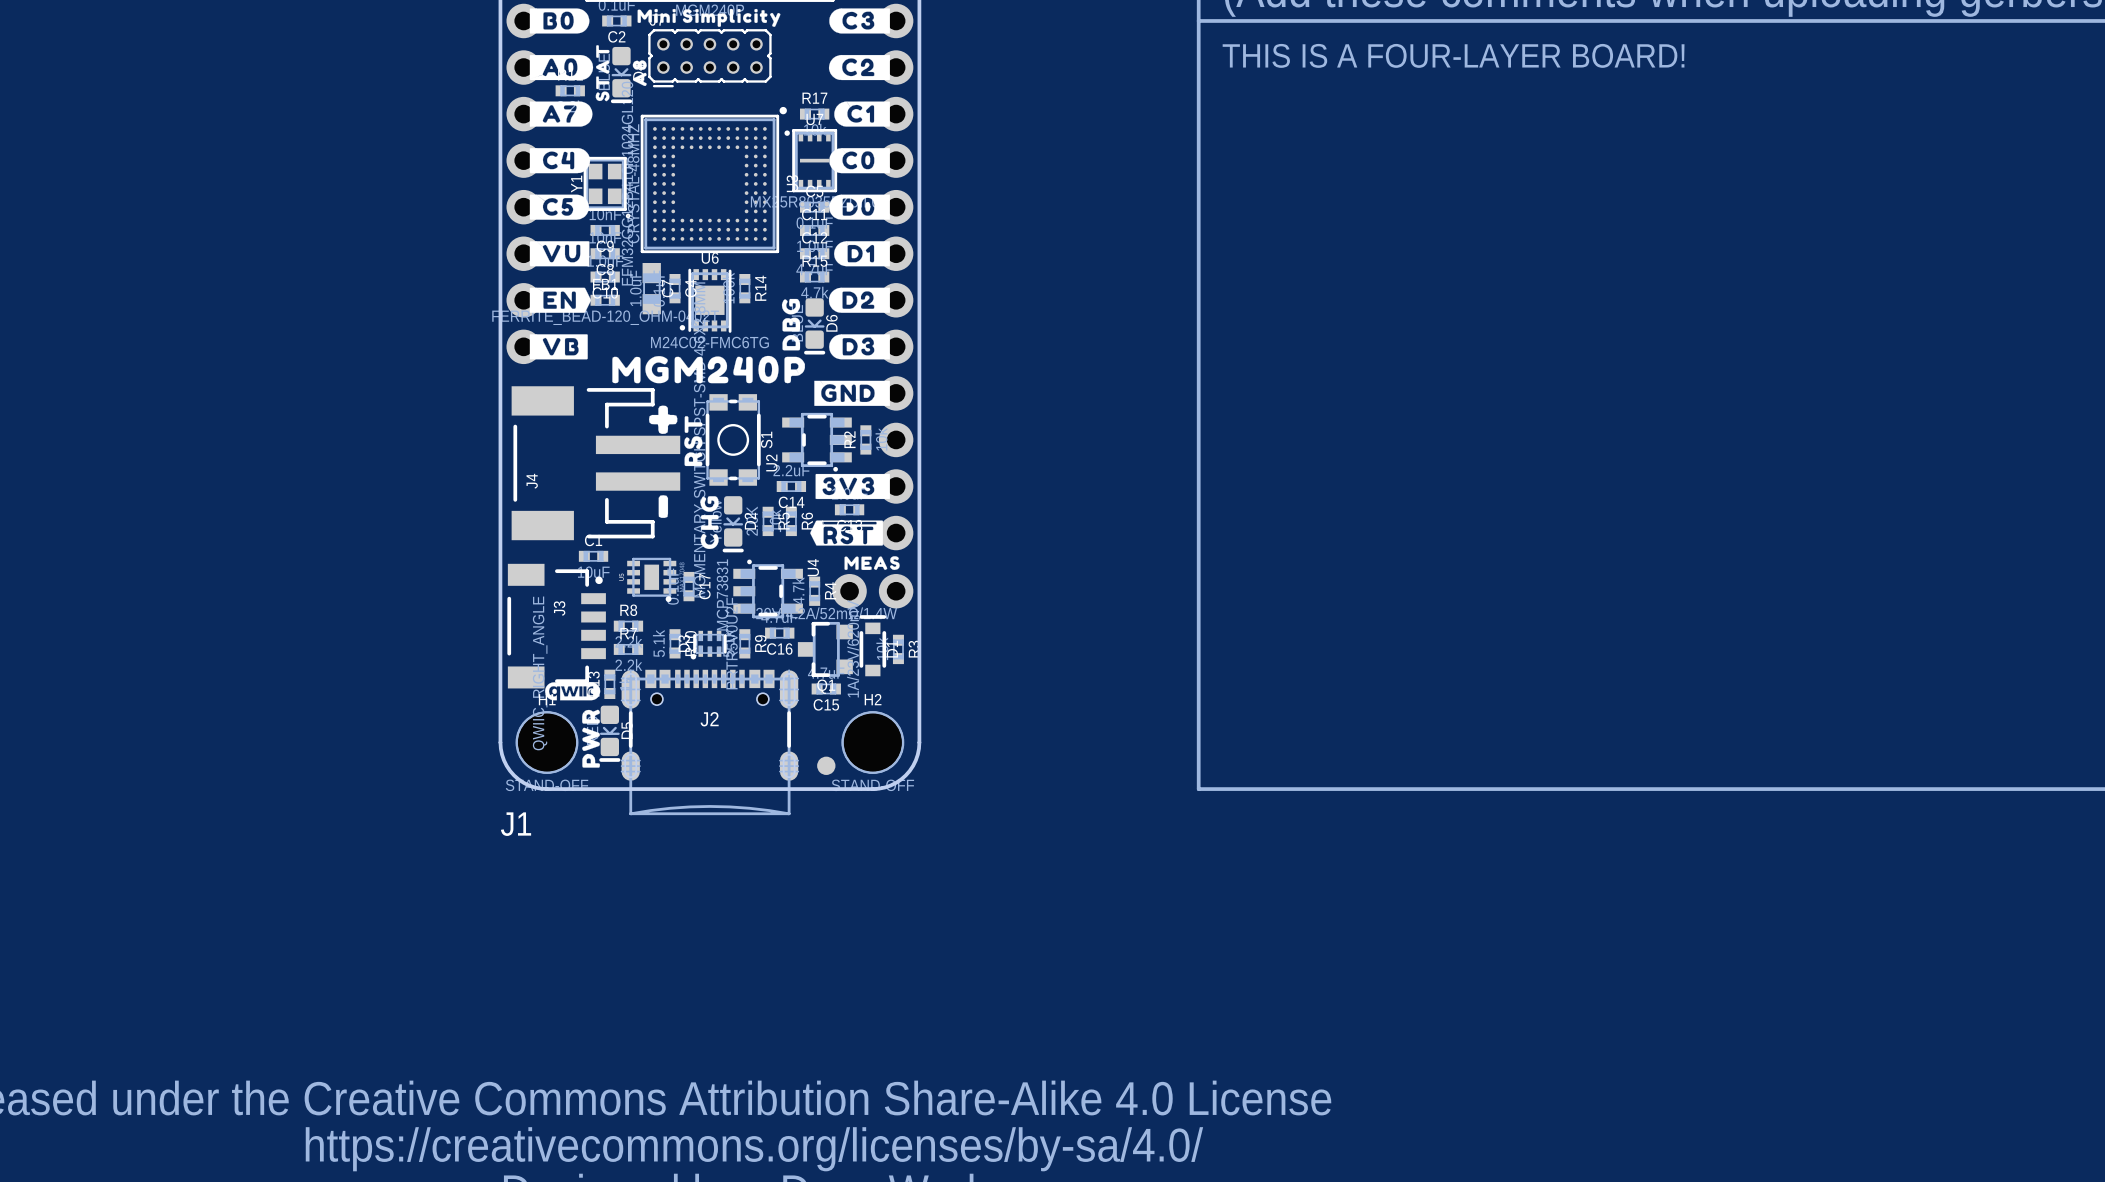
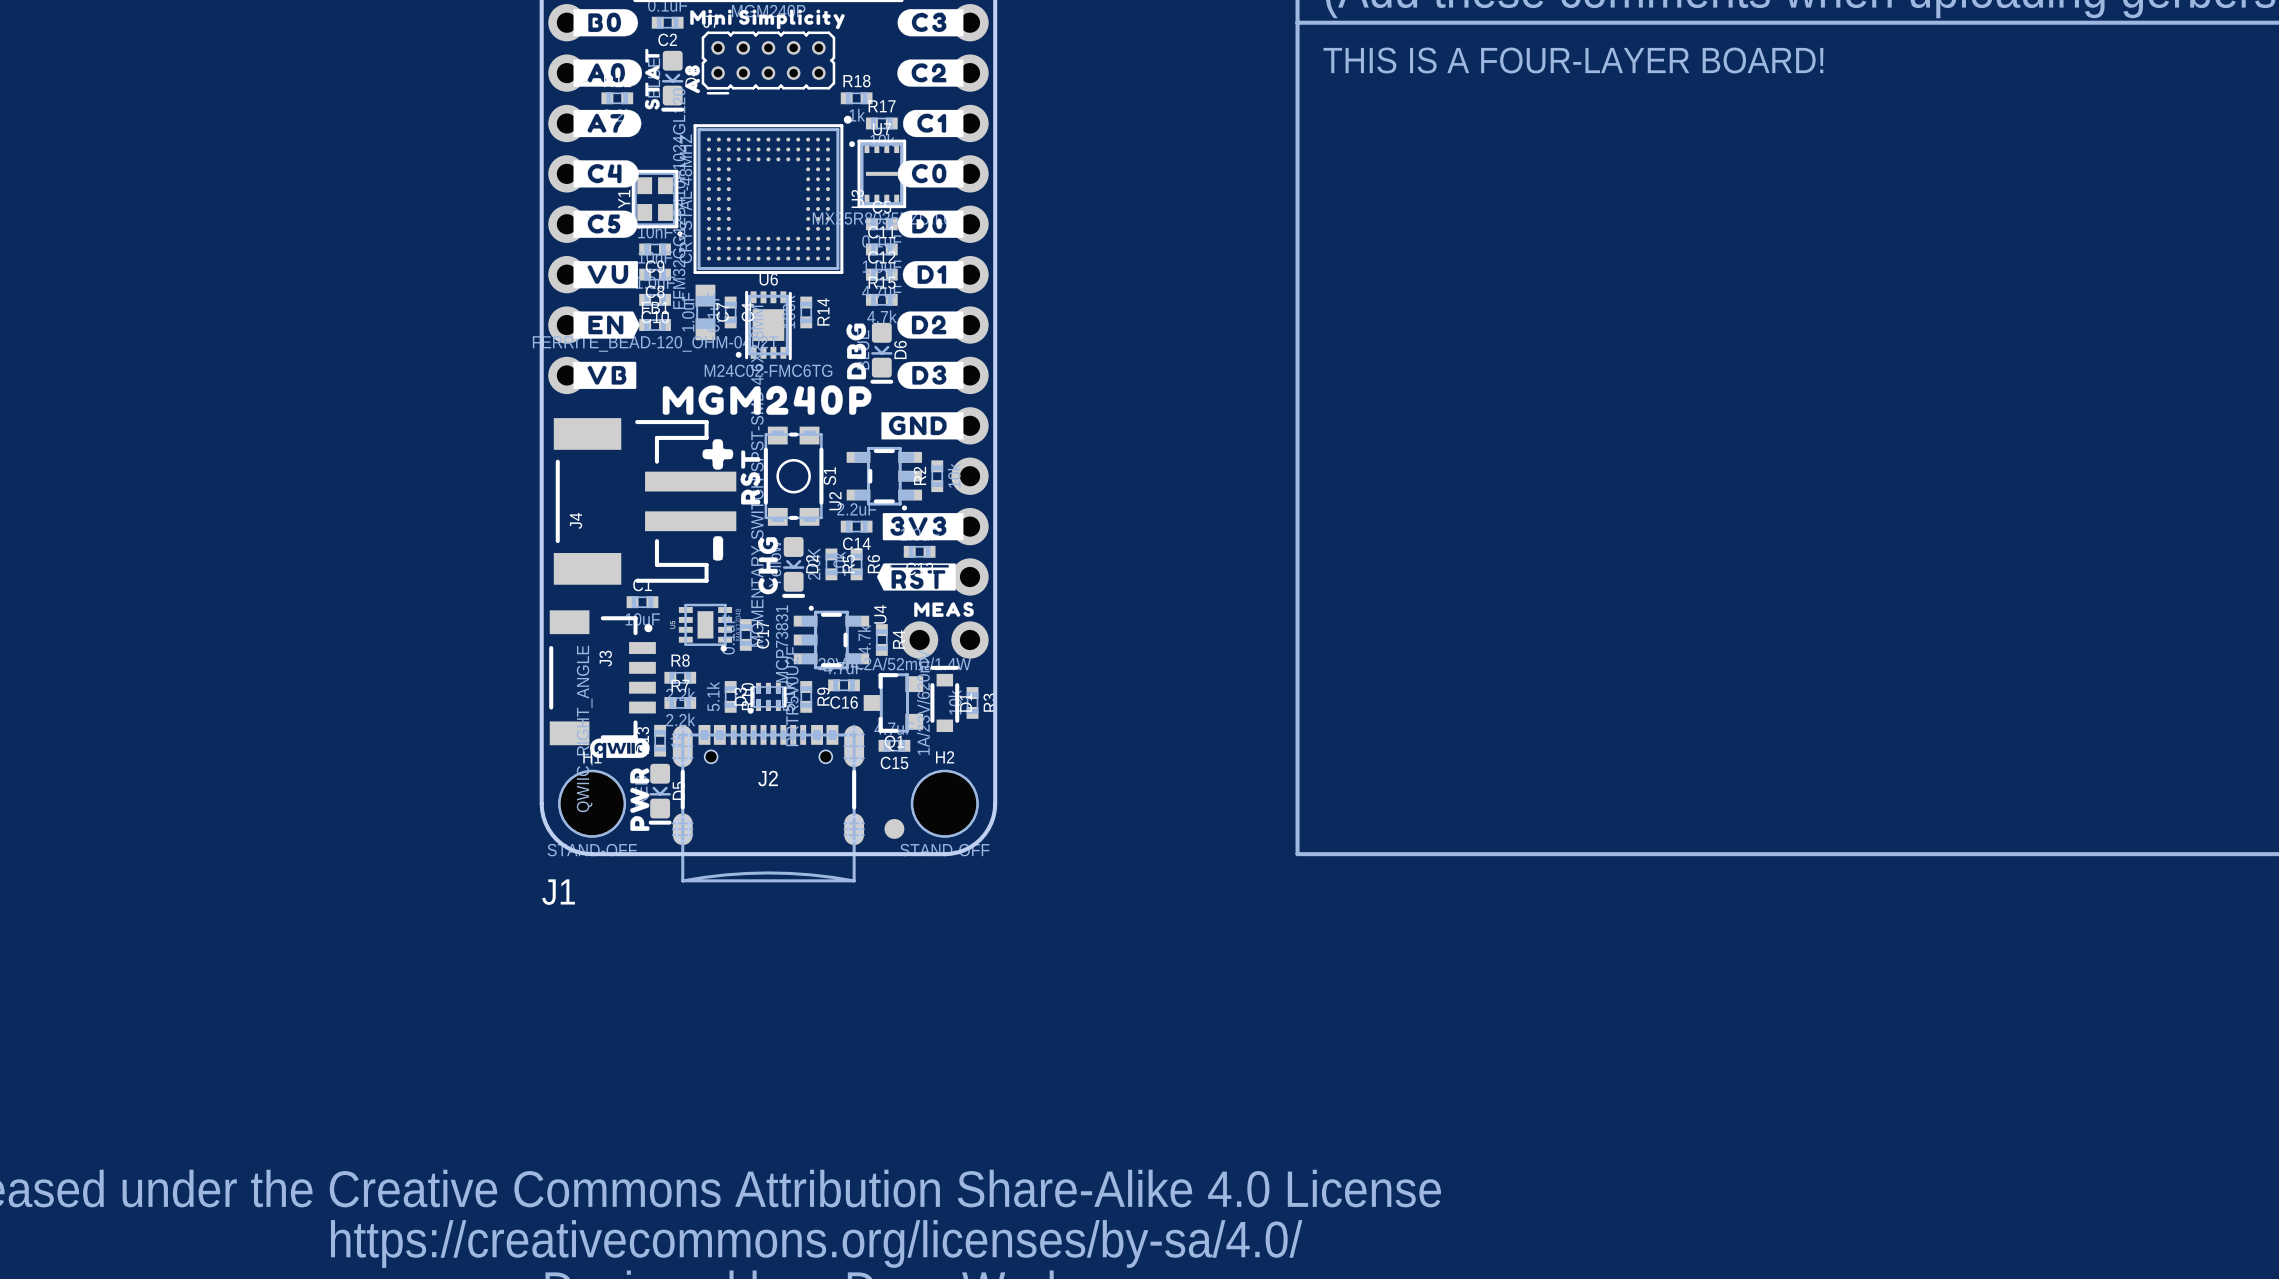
R18: none -> 1k (856, 98)

